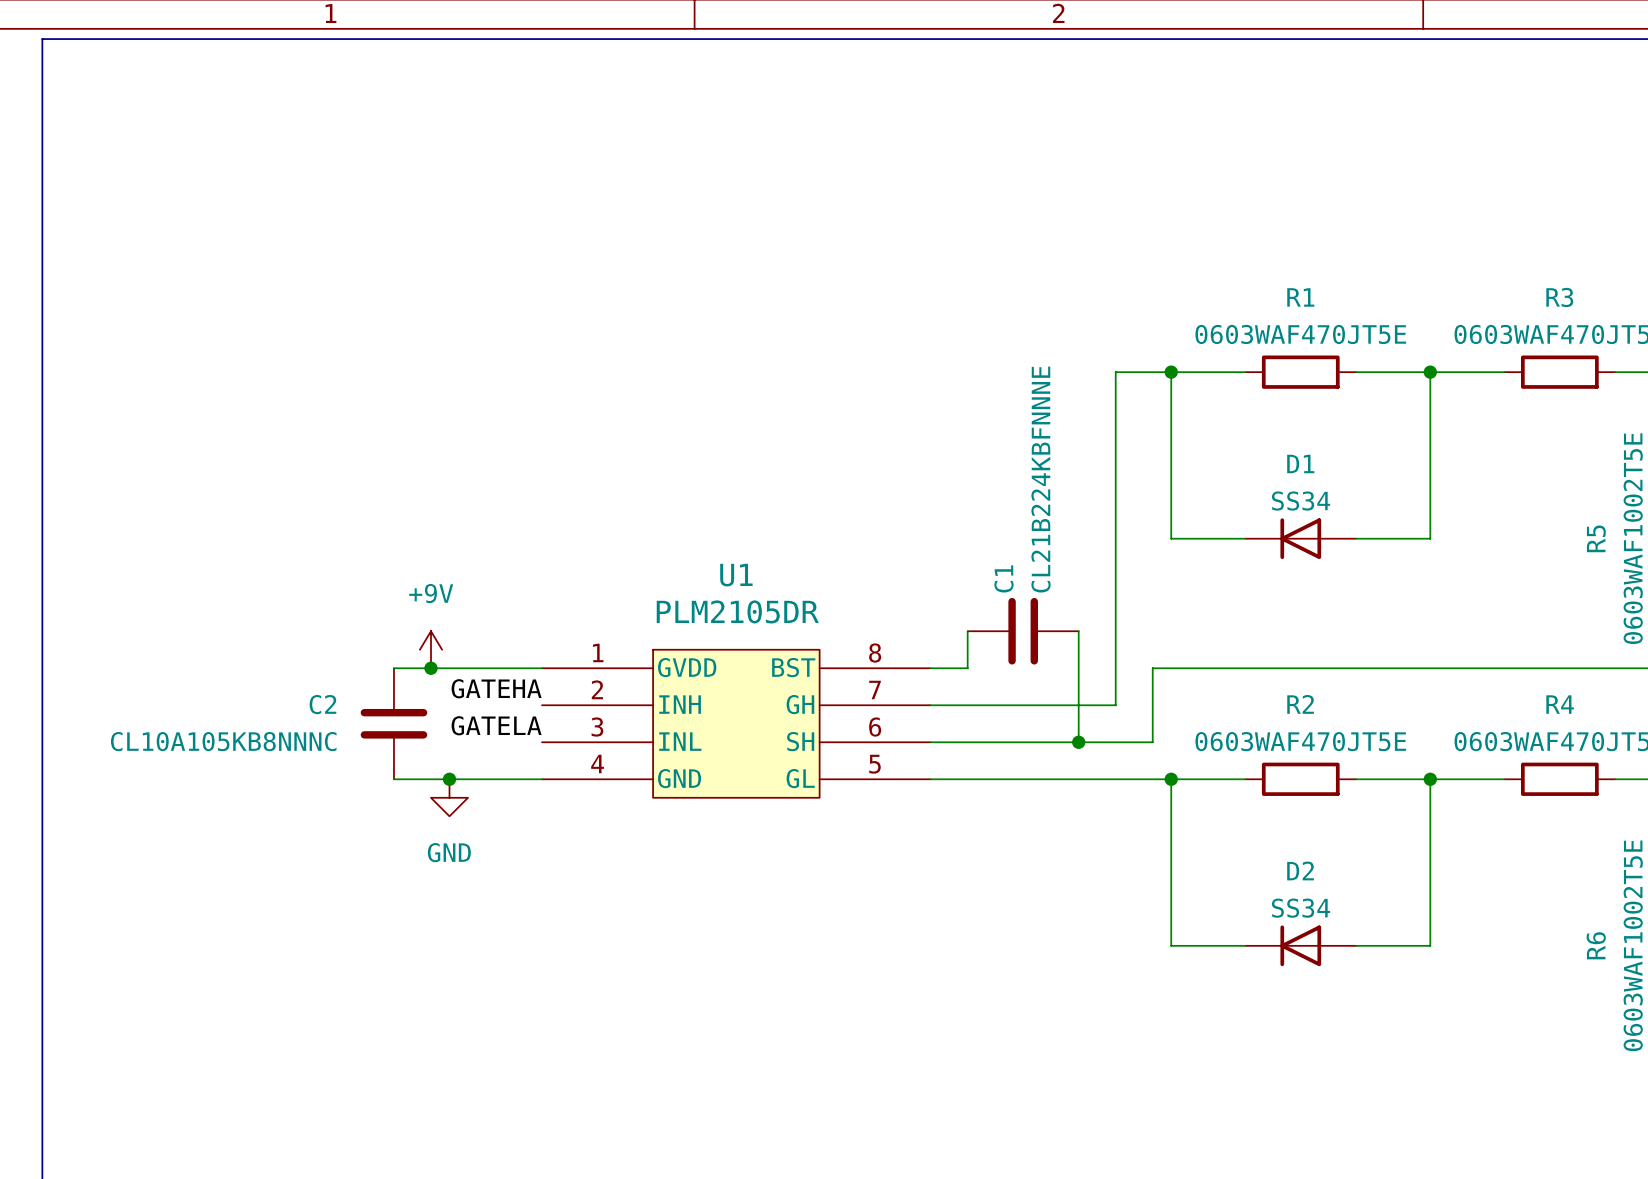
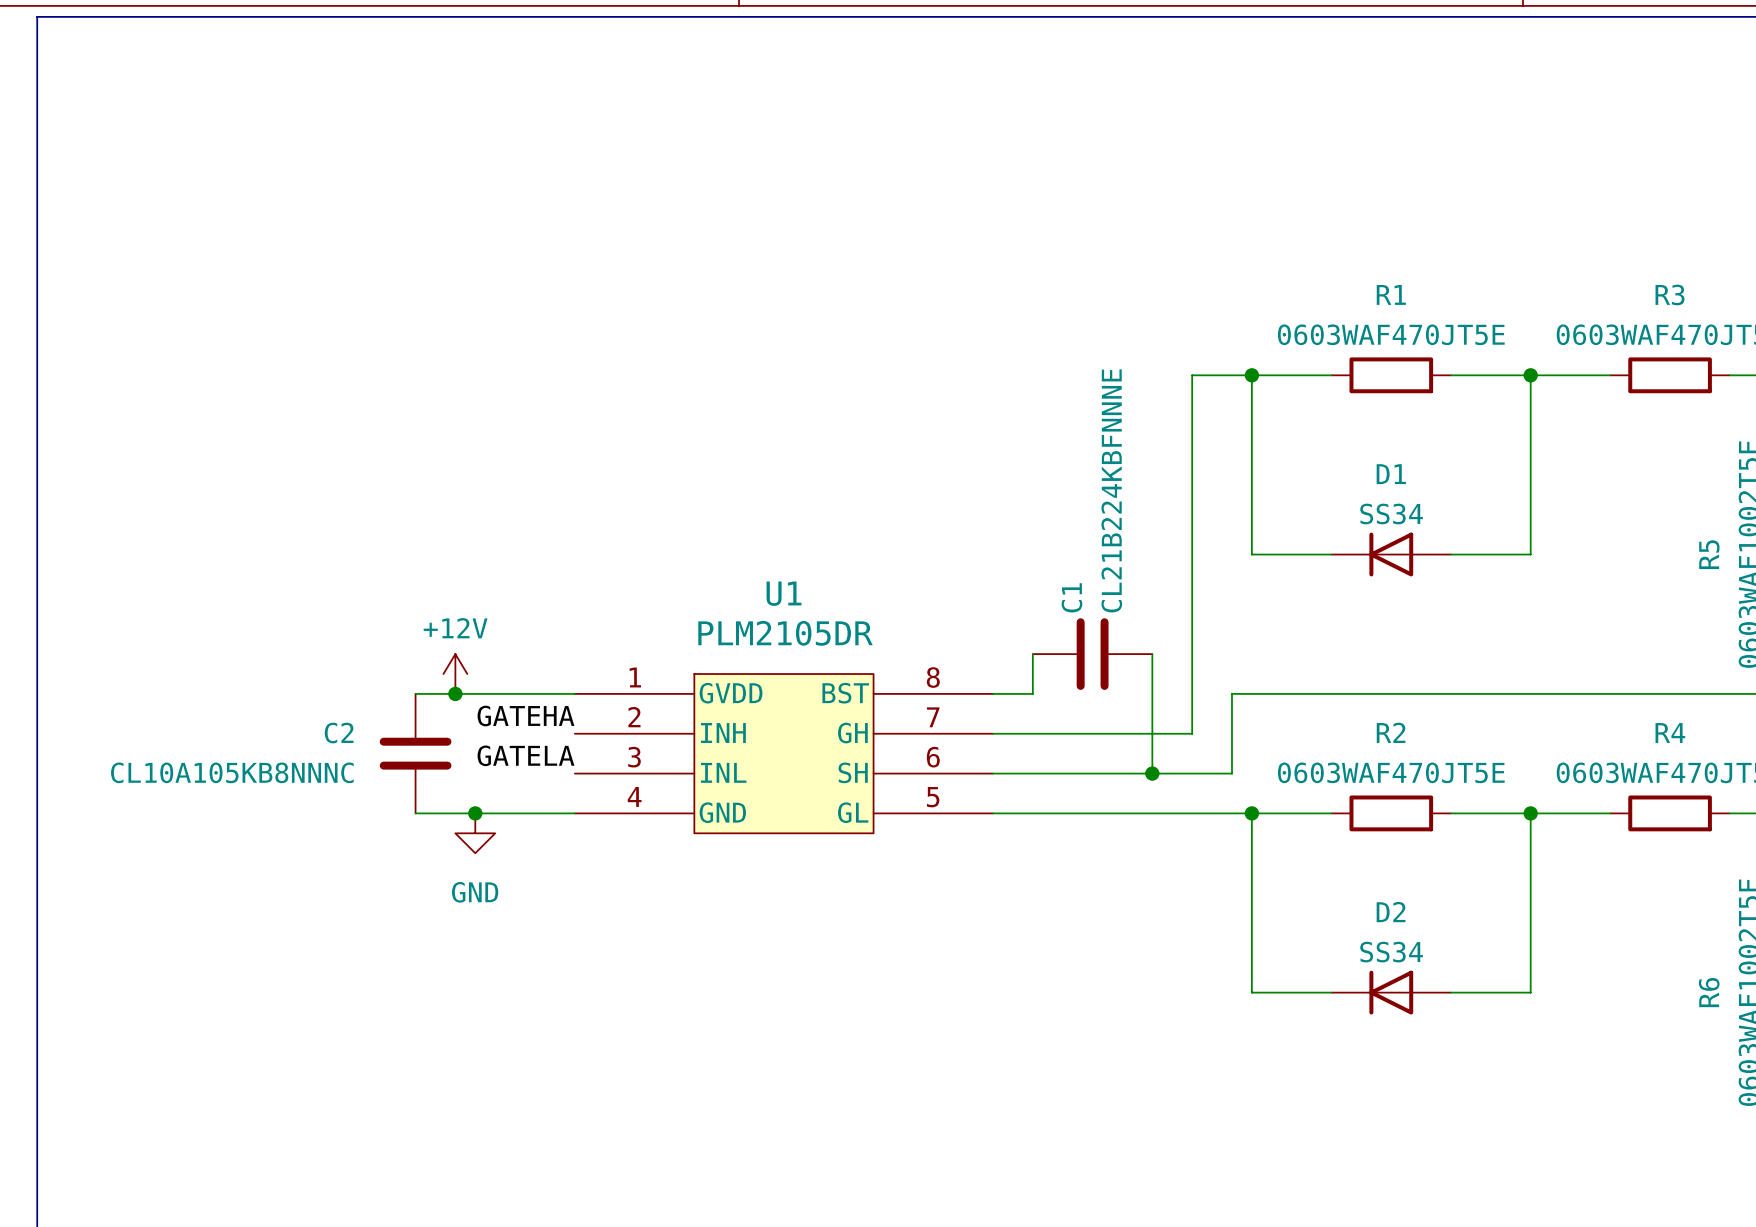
power symbol: +9V (430, 649) -> +12V (455, 674)

